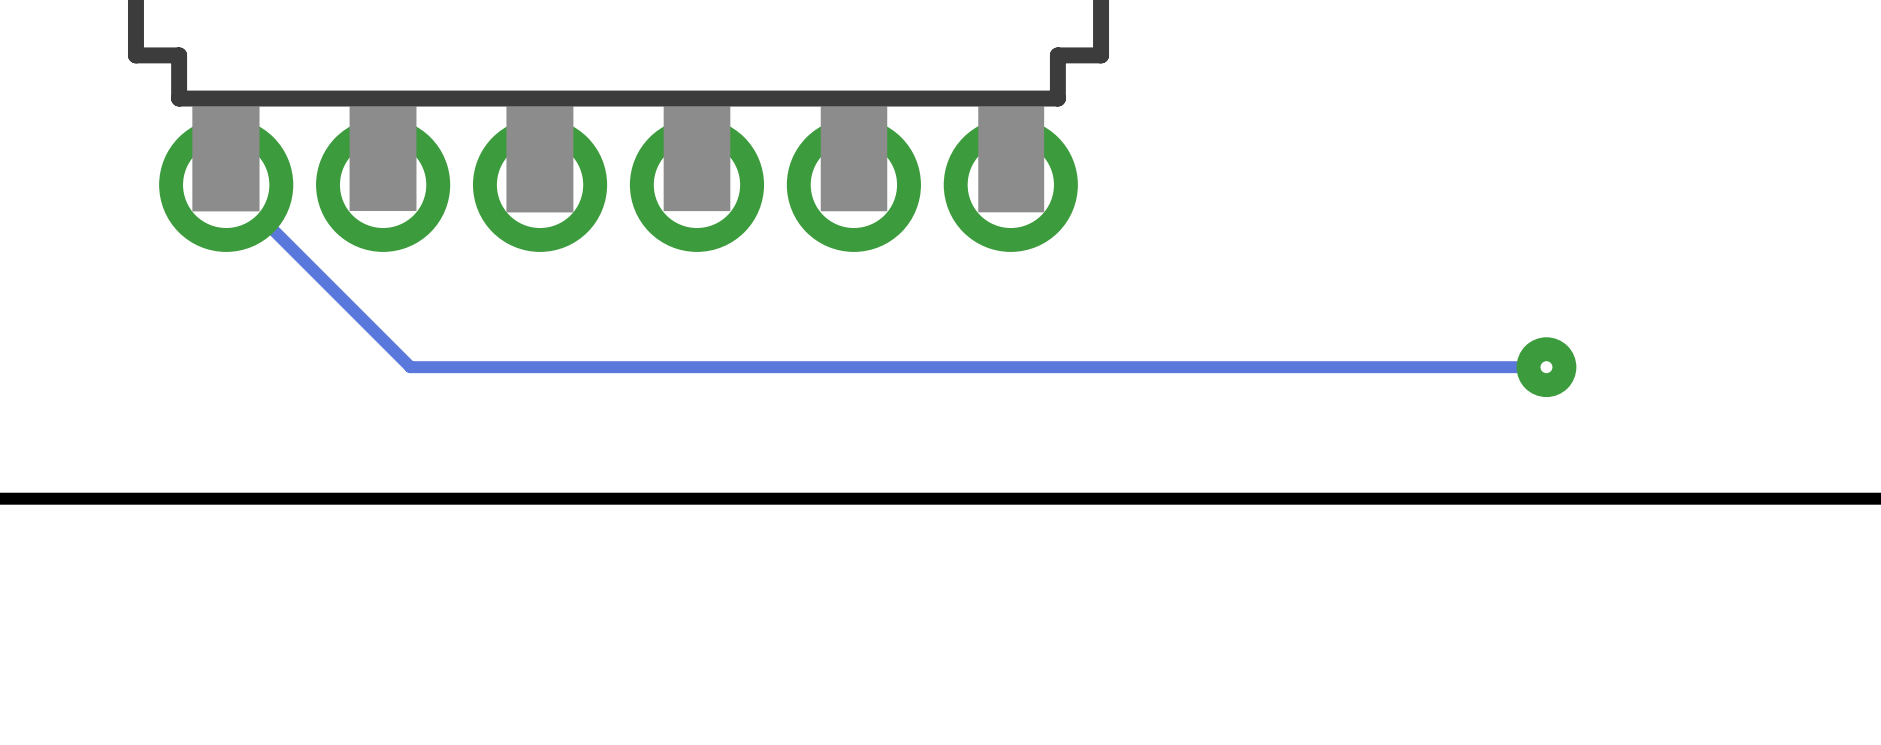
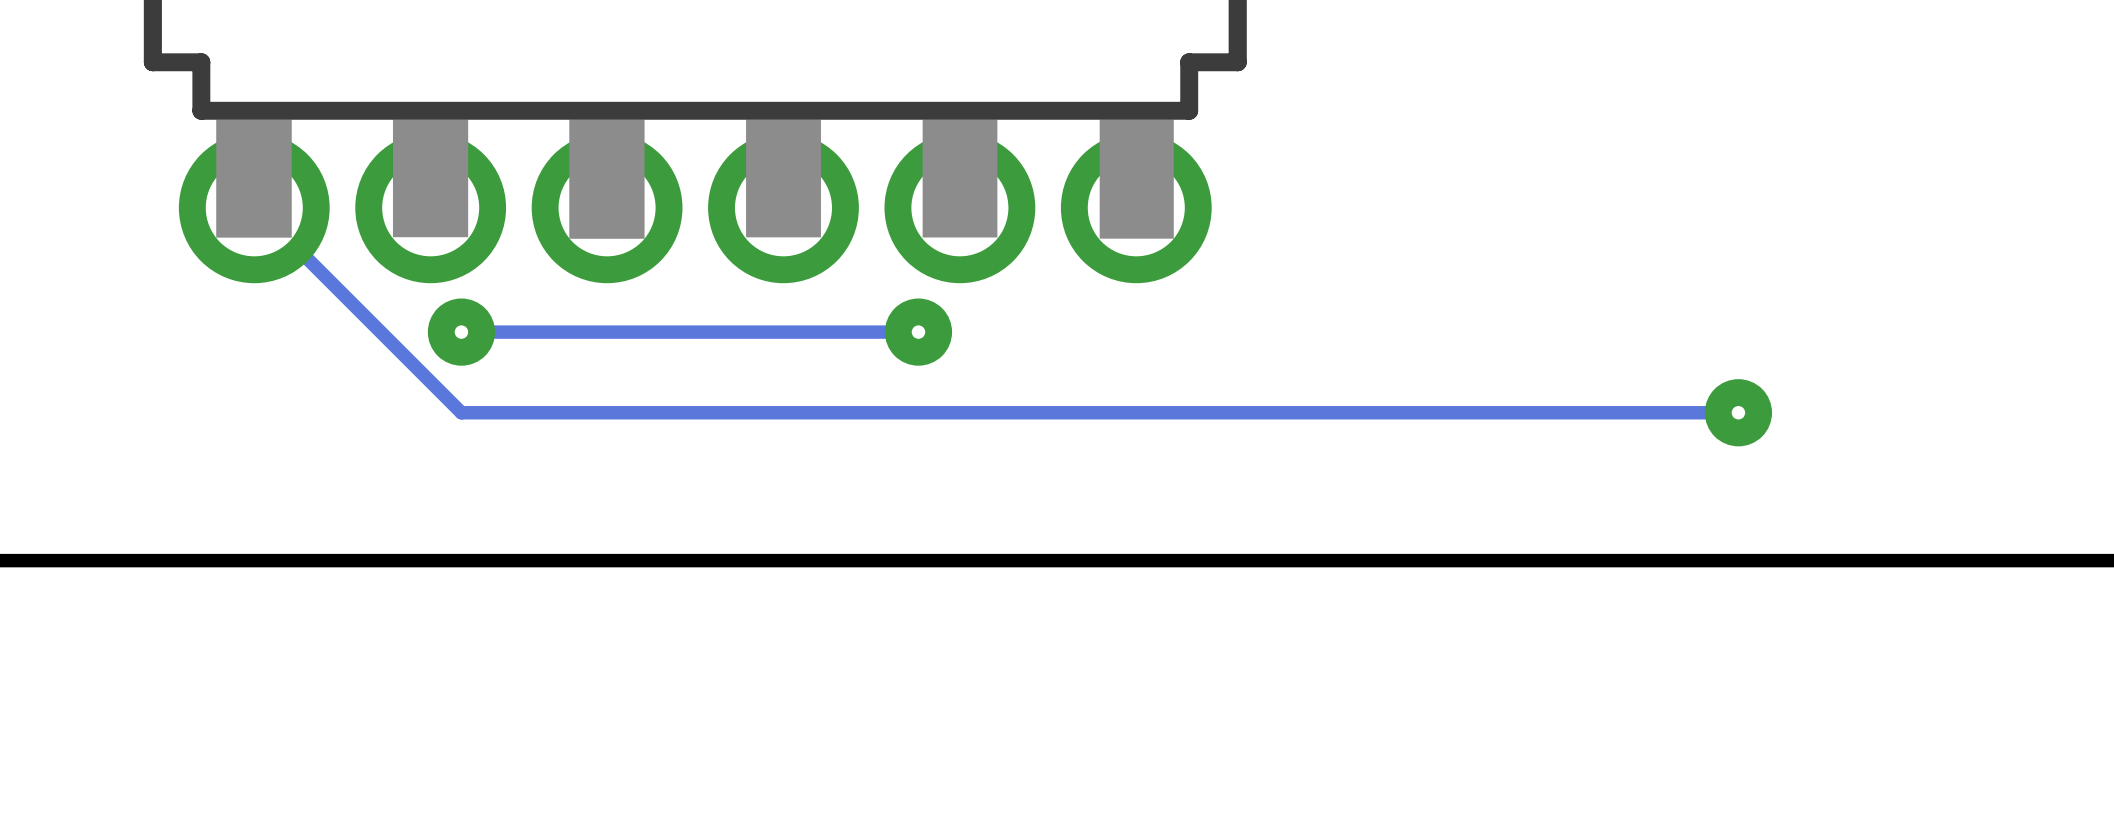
via: none -> (461, 332)
track: none -> (918, 332) (461, 332)
via: none -> (918, 332)

